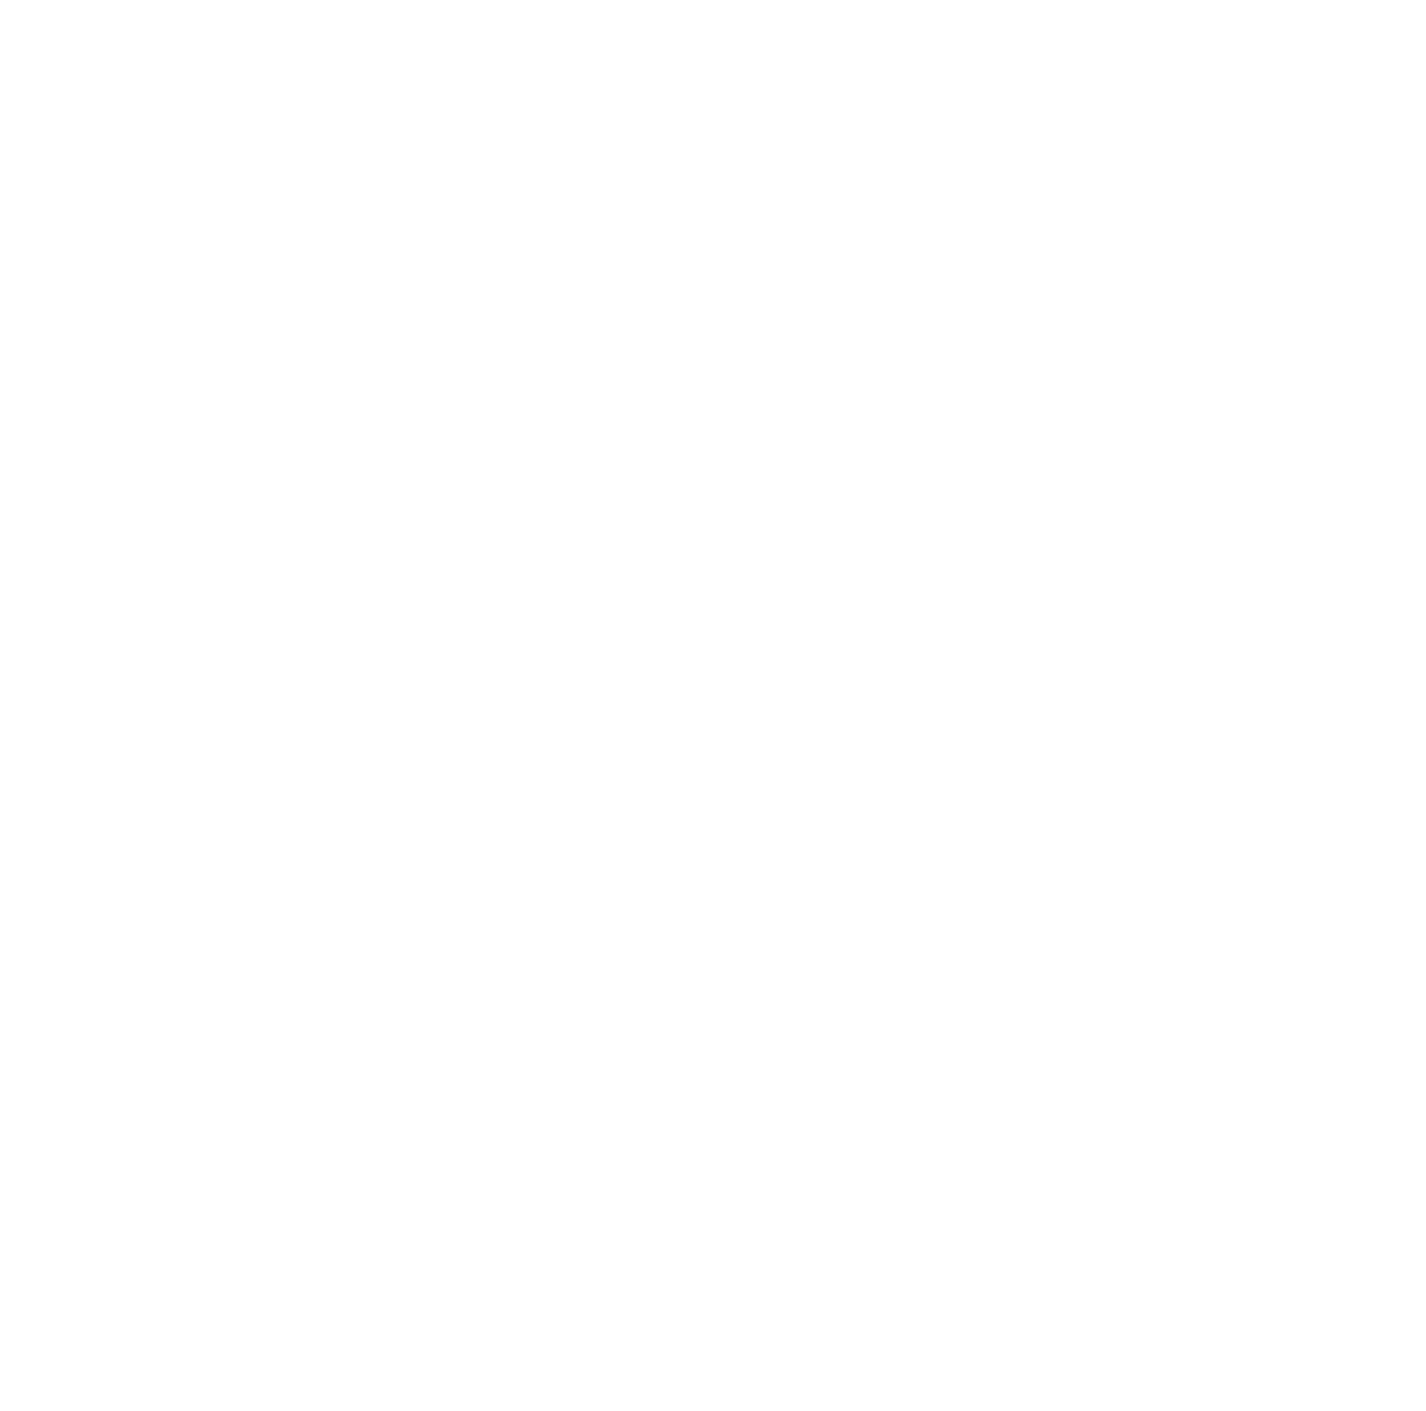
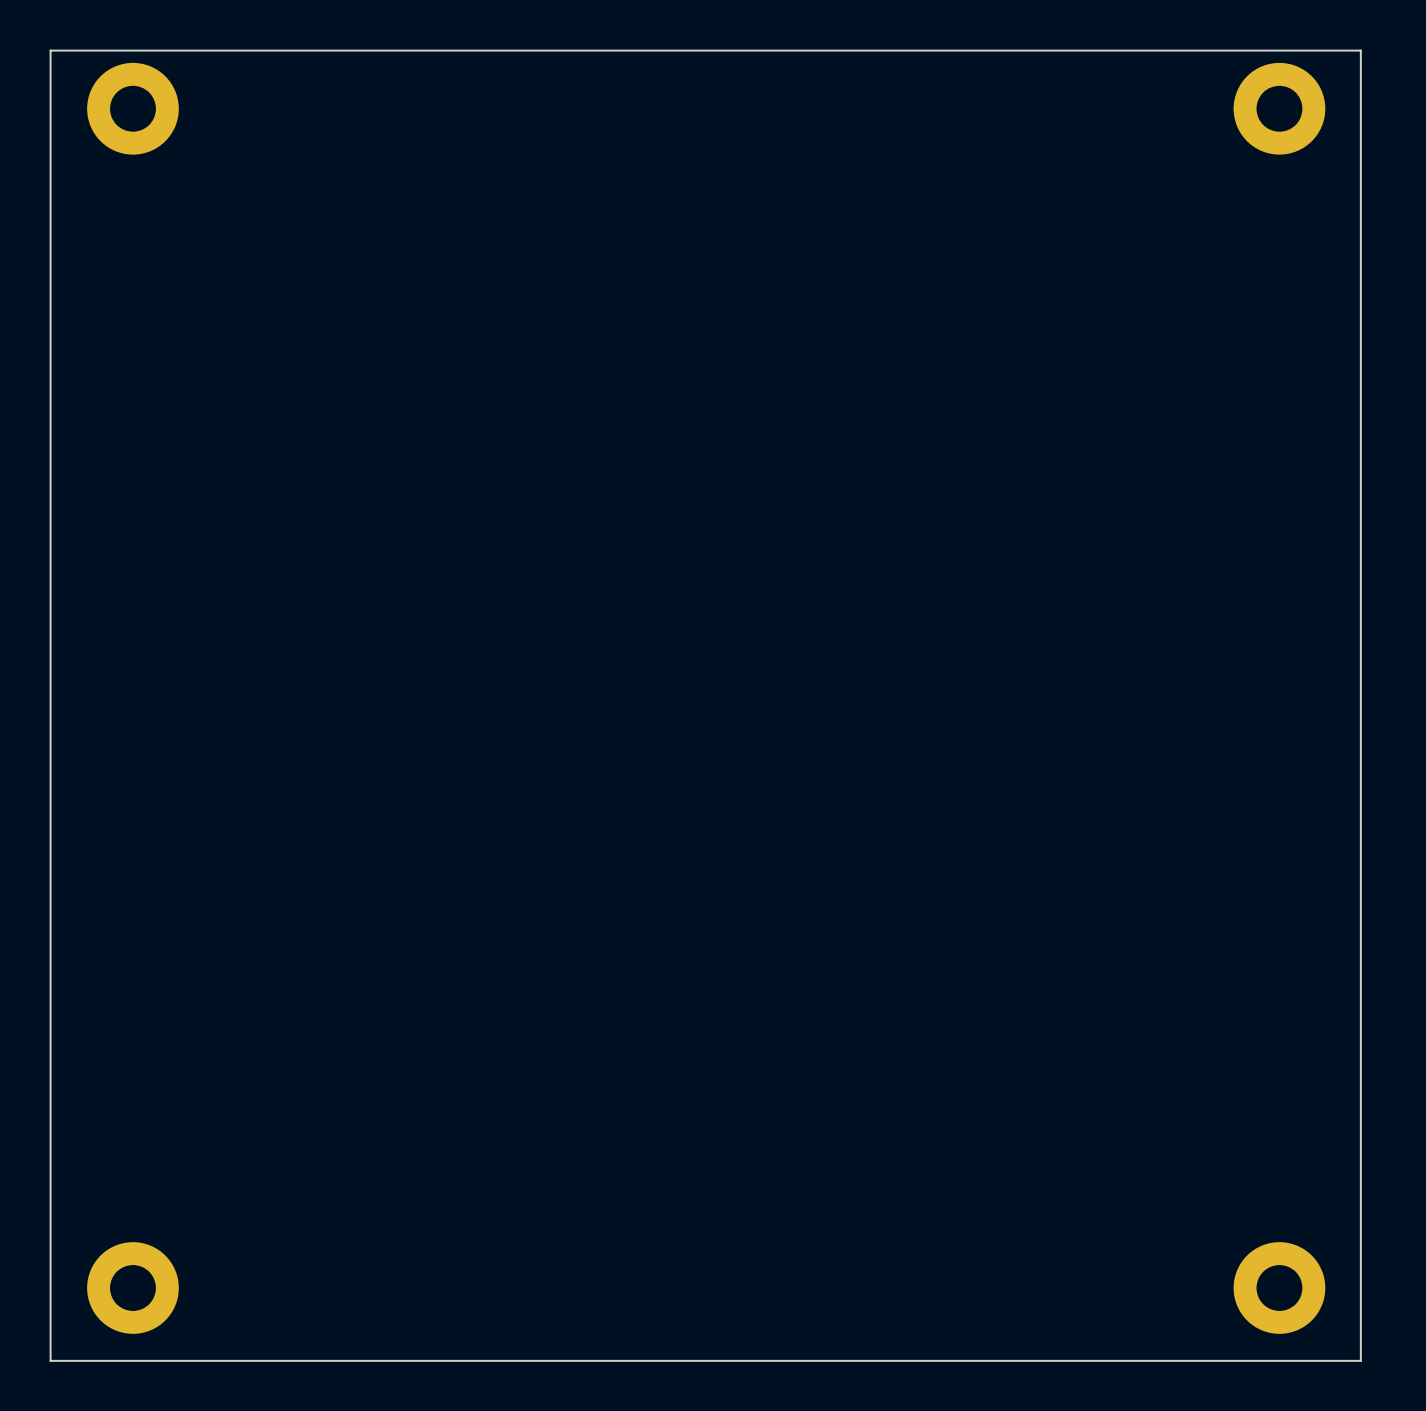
board edge: none -> (1360, 50) (50, 50) (50, 1360) (1360, 1360) (1360, 50)
part: none -> (132, 108)
part: none -> (1279, 108)
part: none -> (132, 1288)
part: none -> (1279, 1288)

